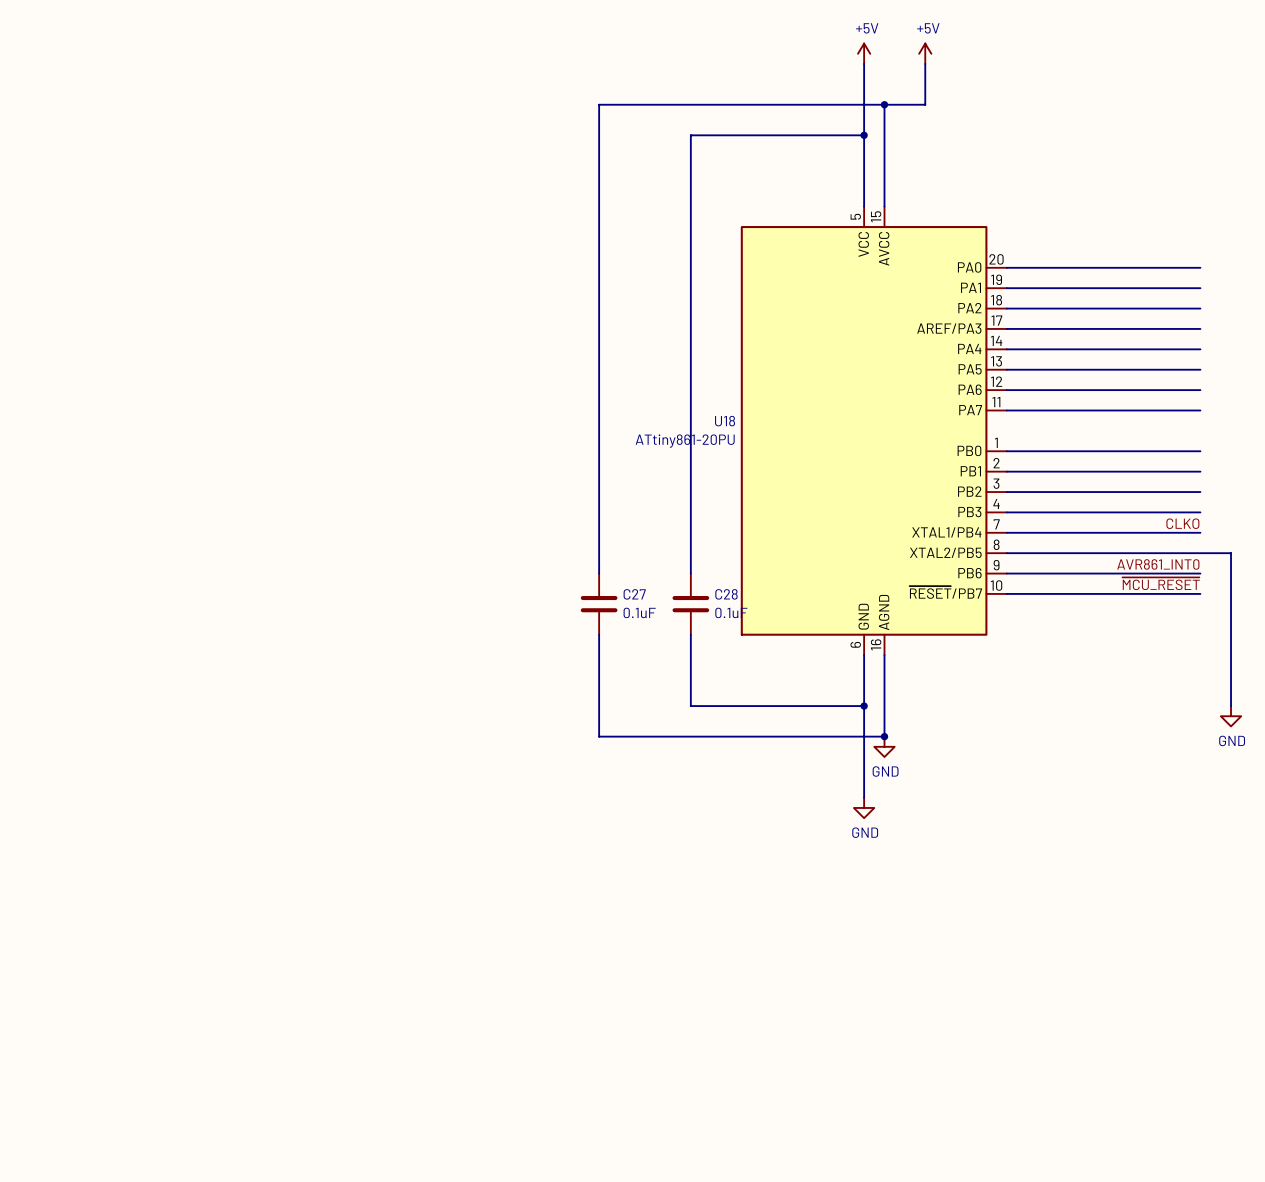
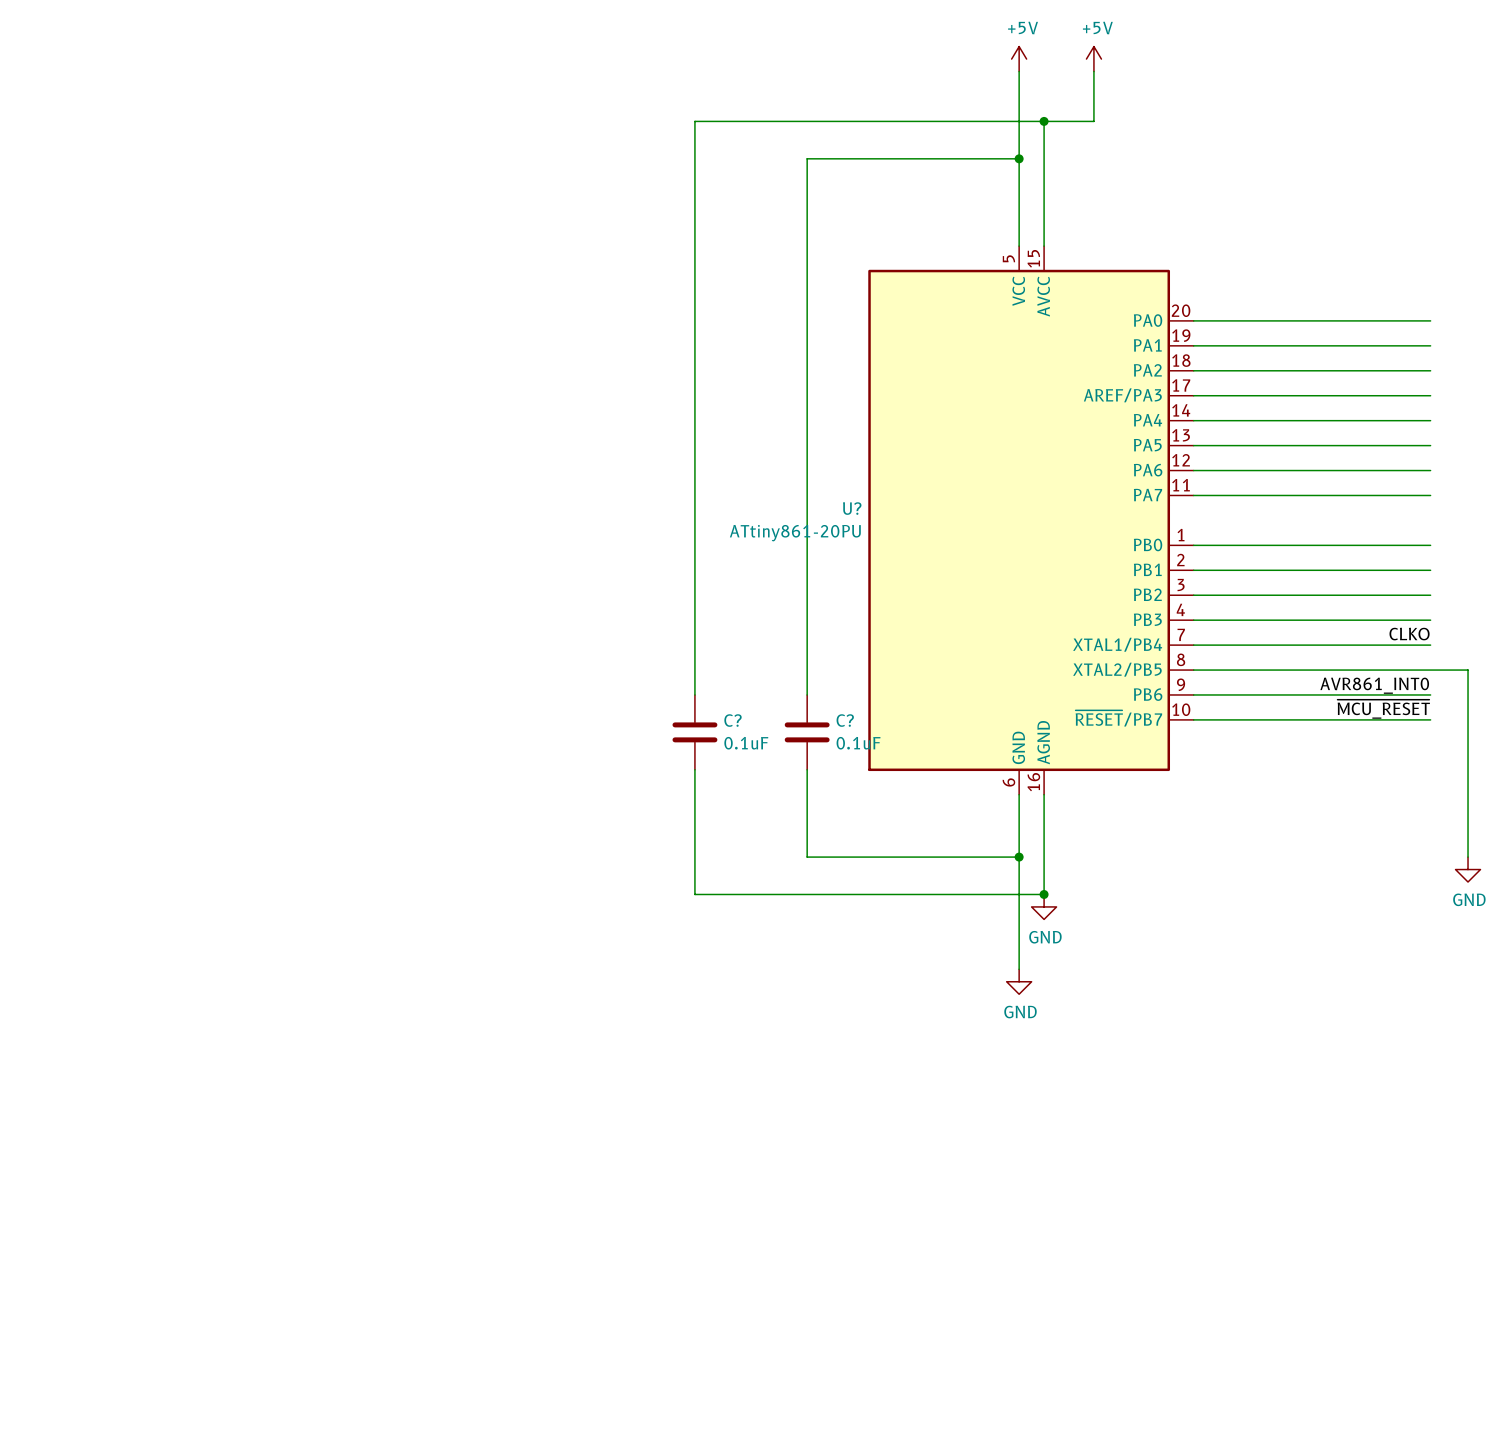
U18 name: U18 (725, 421) -> U? (852, 508)
C27 name: C27 (634, 594) -> C? (733, 720)
C28 name: C28 (726, 594) -> C? (845, 720)

